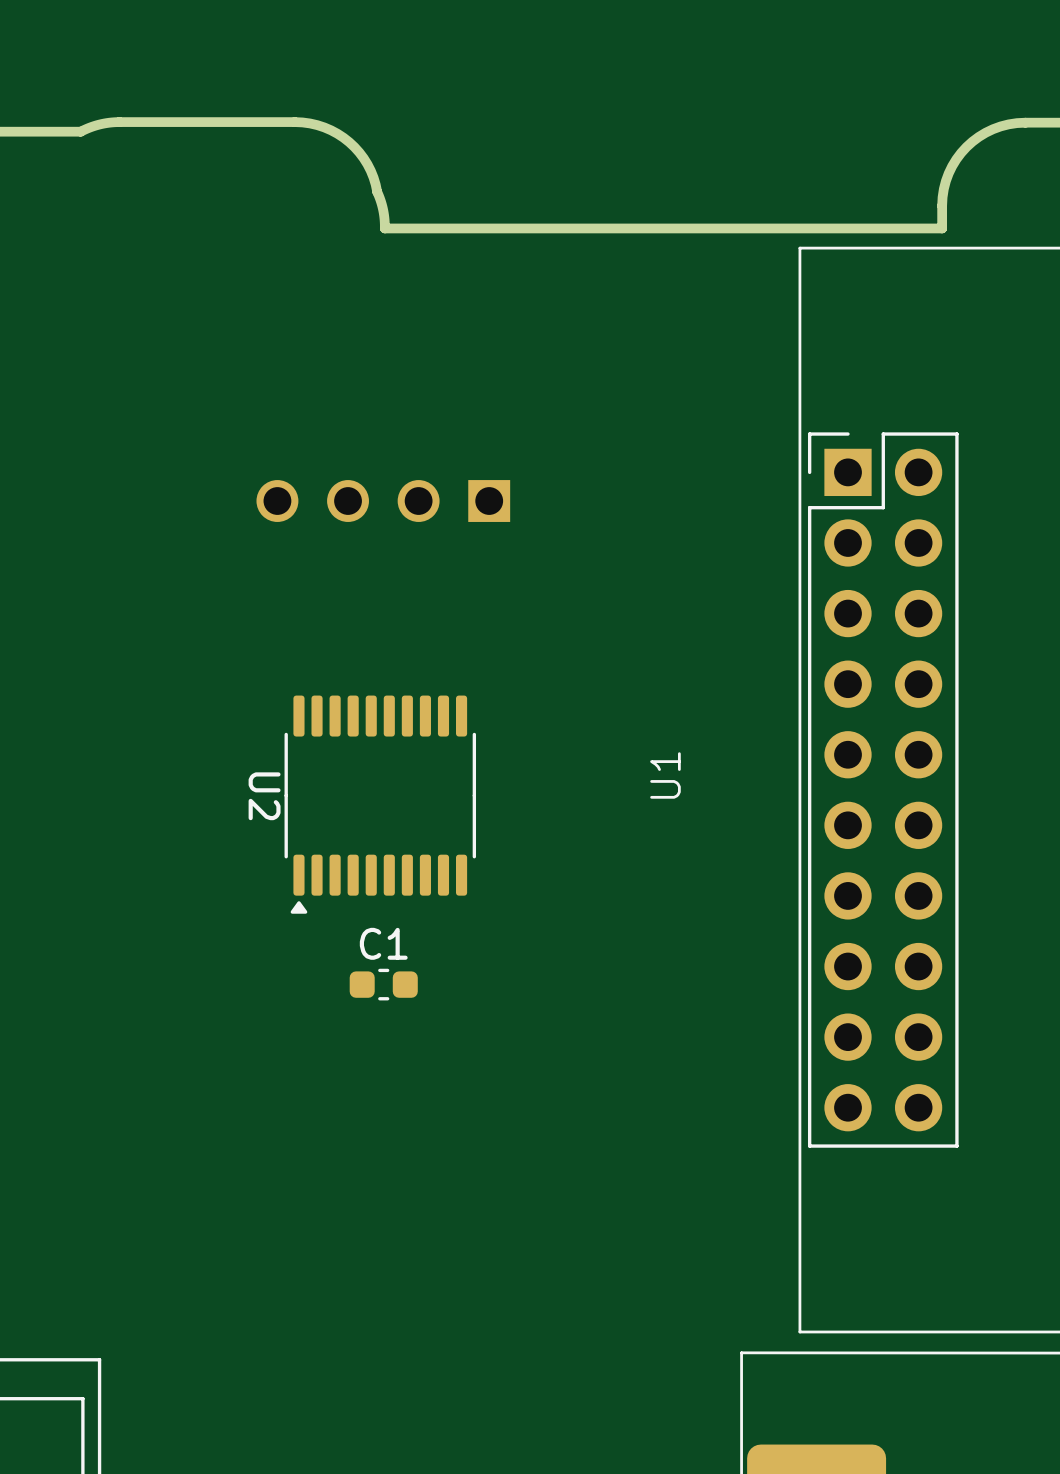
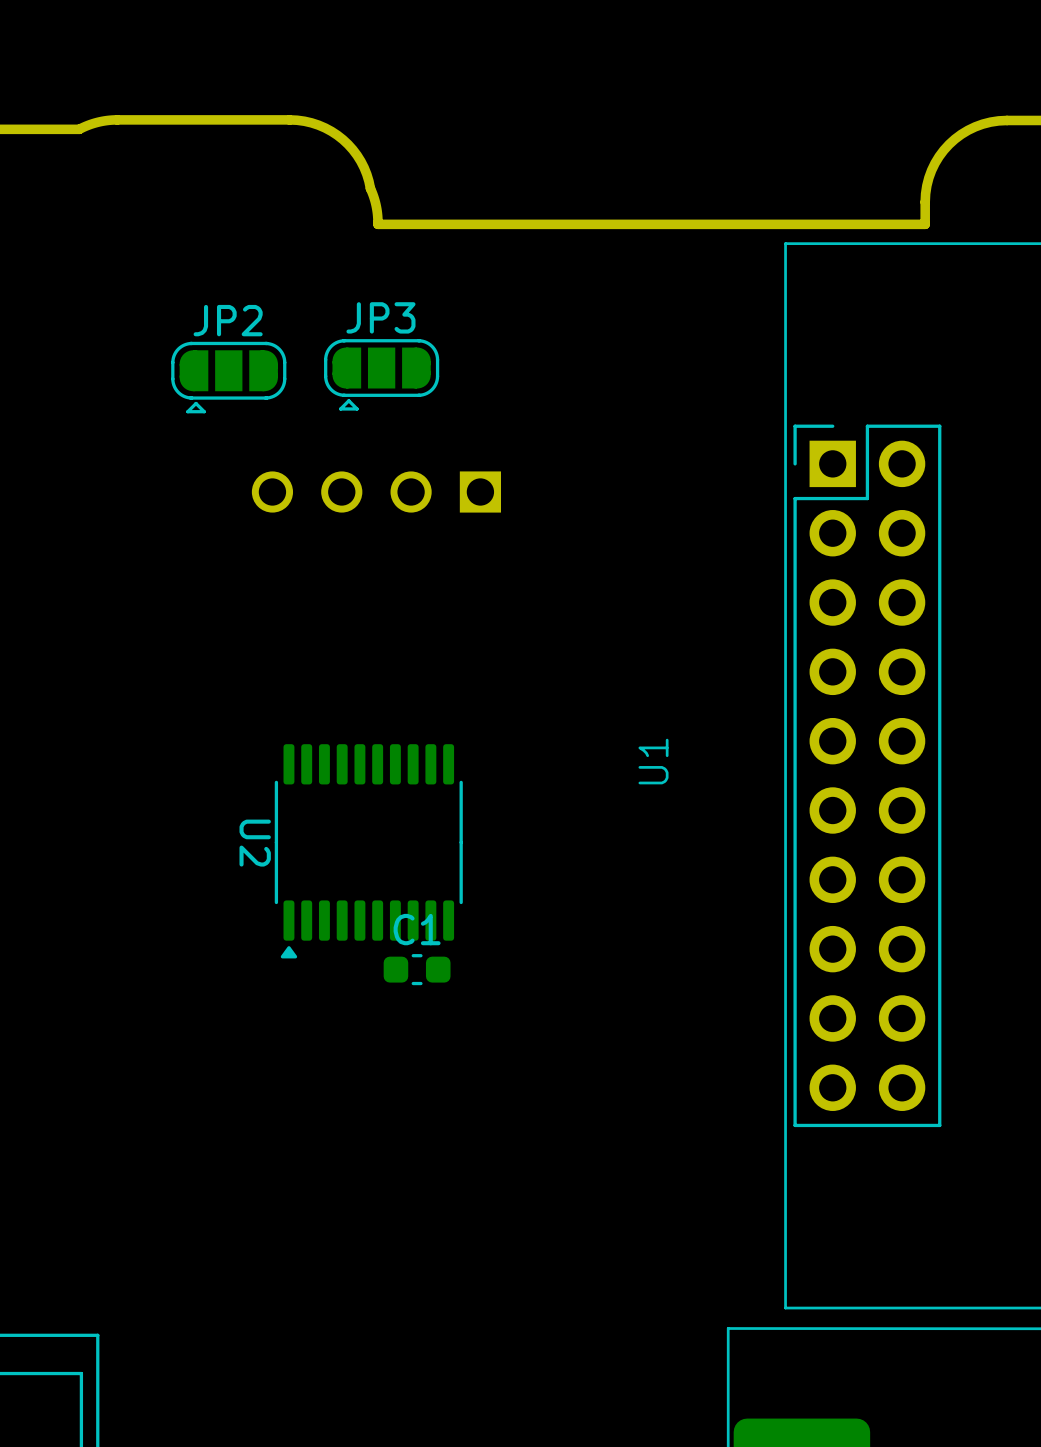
JP3: none -> (381, 374)
JP2: none -> (228, 377)
U2 position: (380, 804) -> (368, 851)
C1 position: (383, 984) -> (417, 969)

